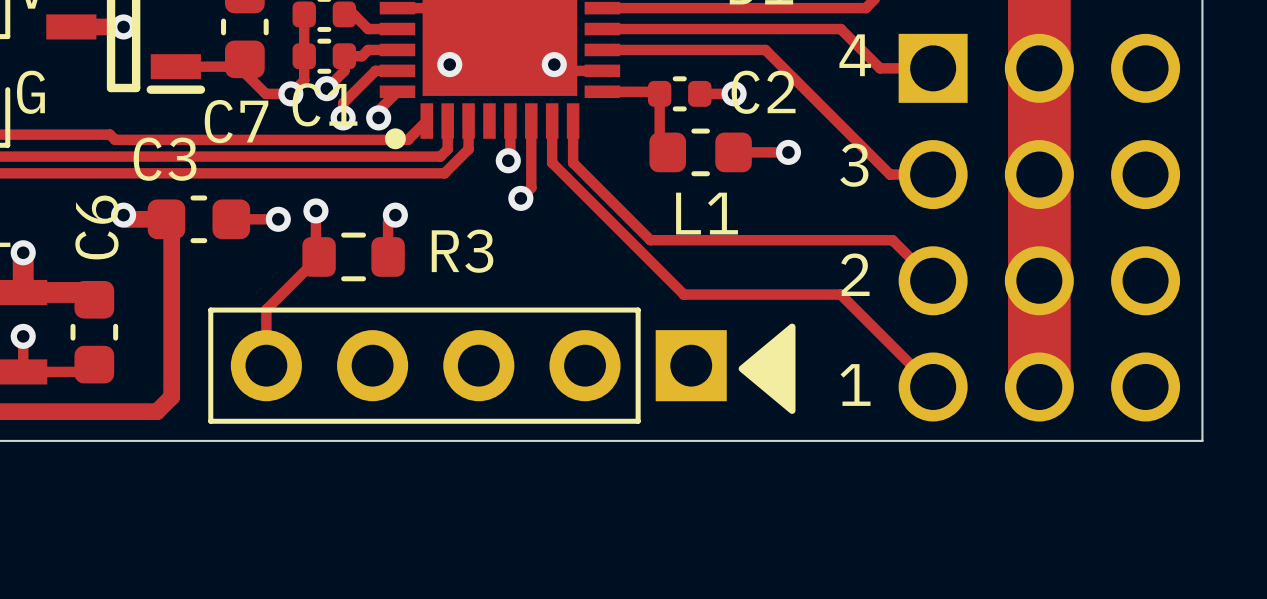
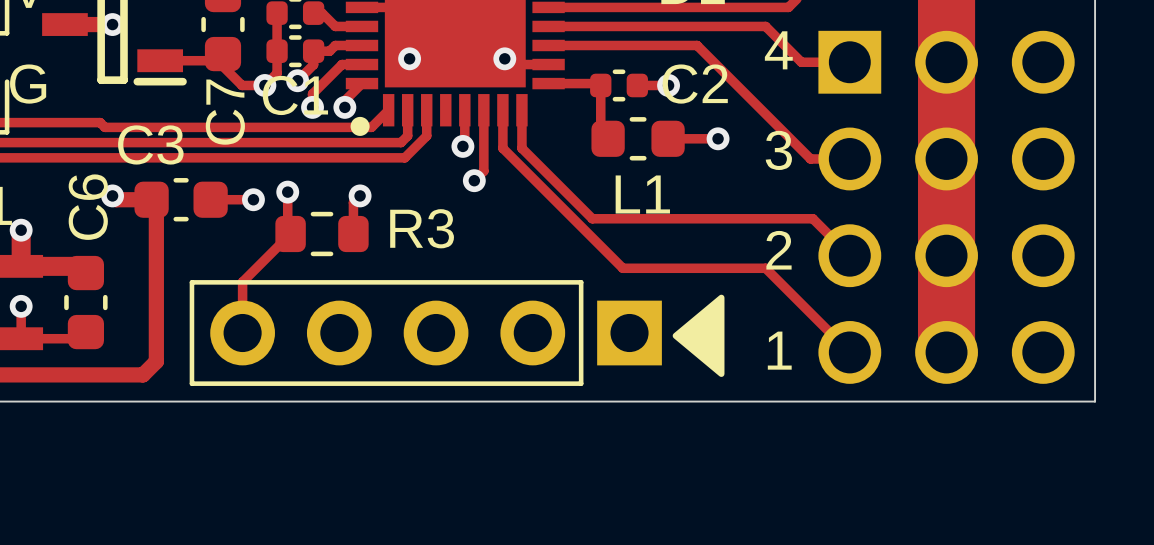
C7 name rotation: 0° (236, 121) -> 90° counterclockwise (225, 112)

